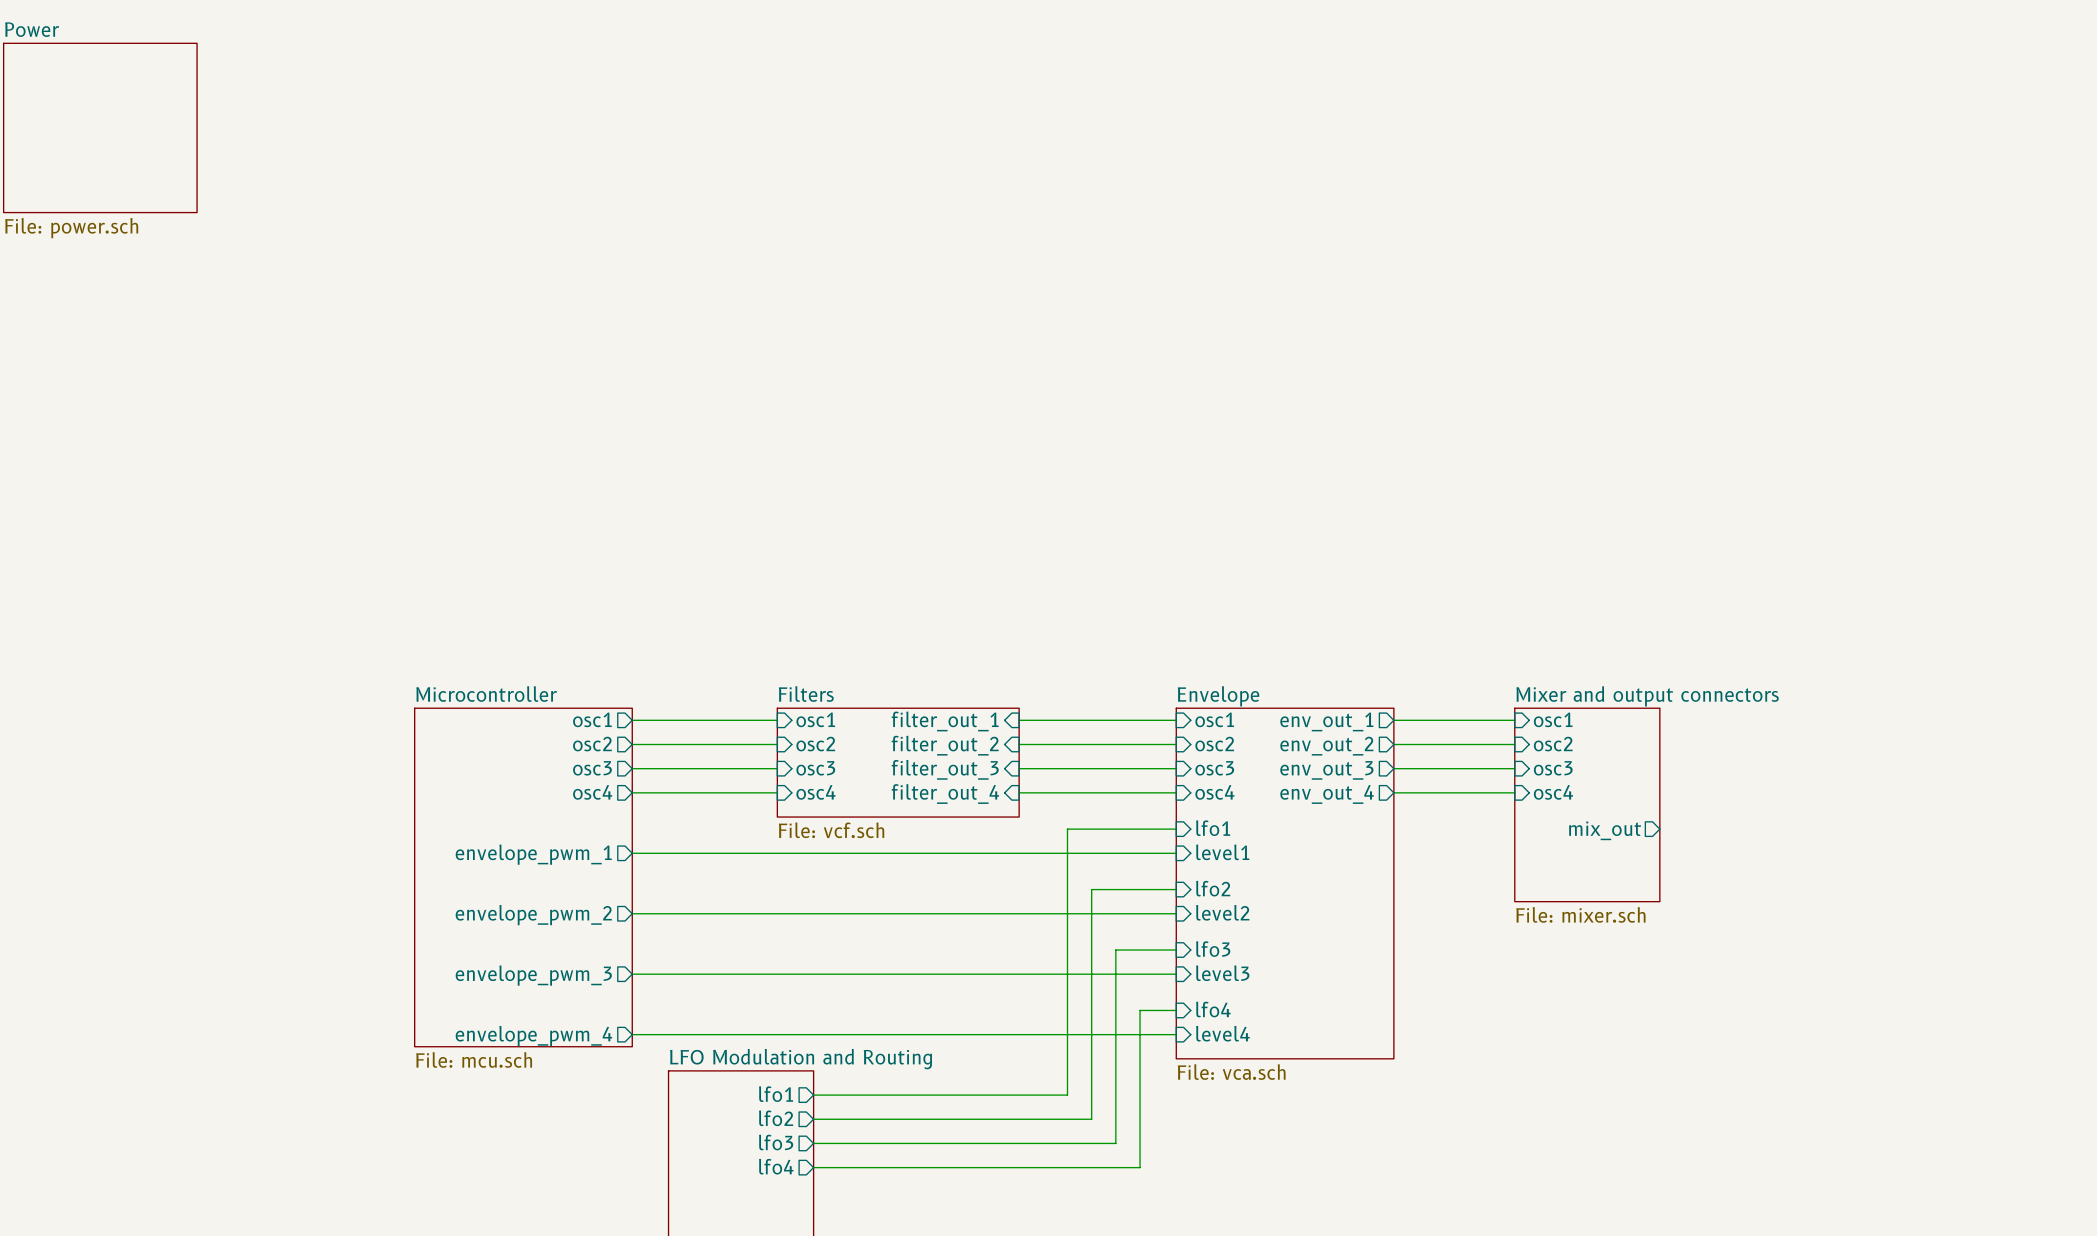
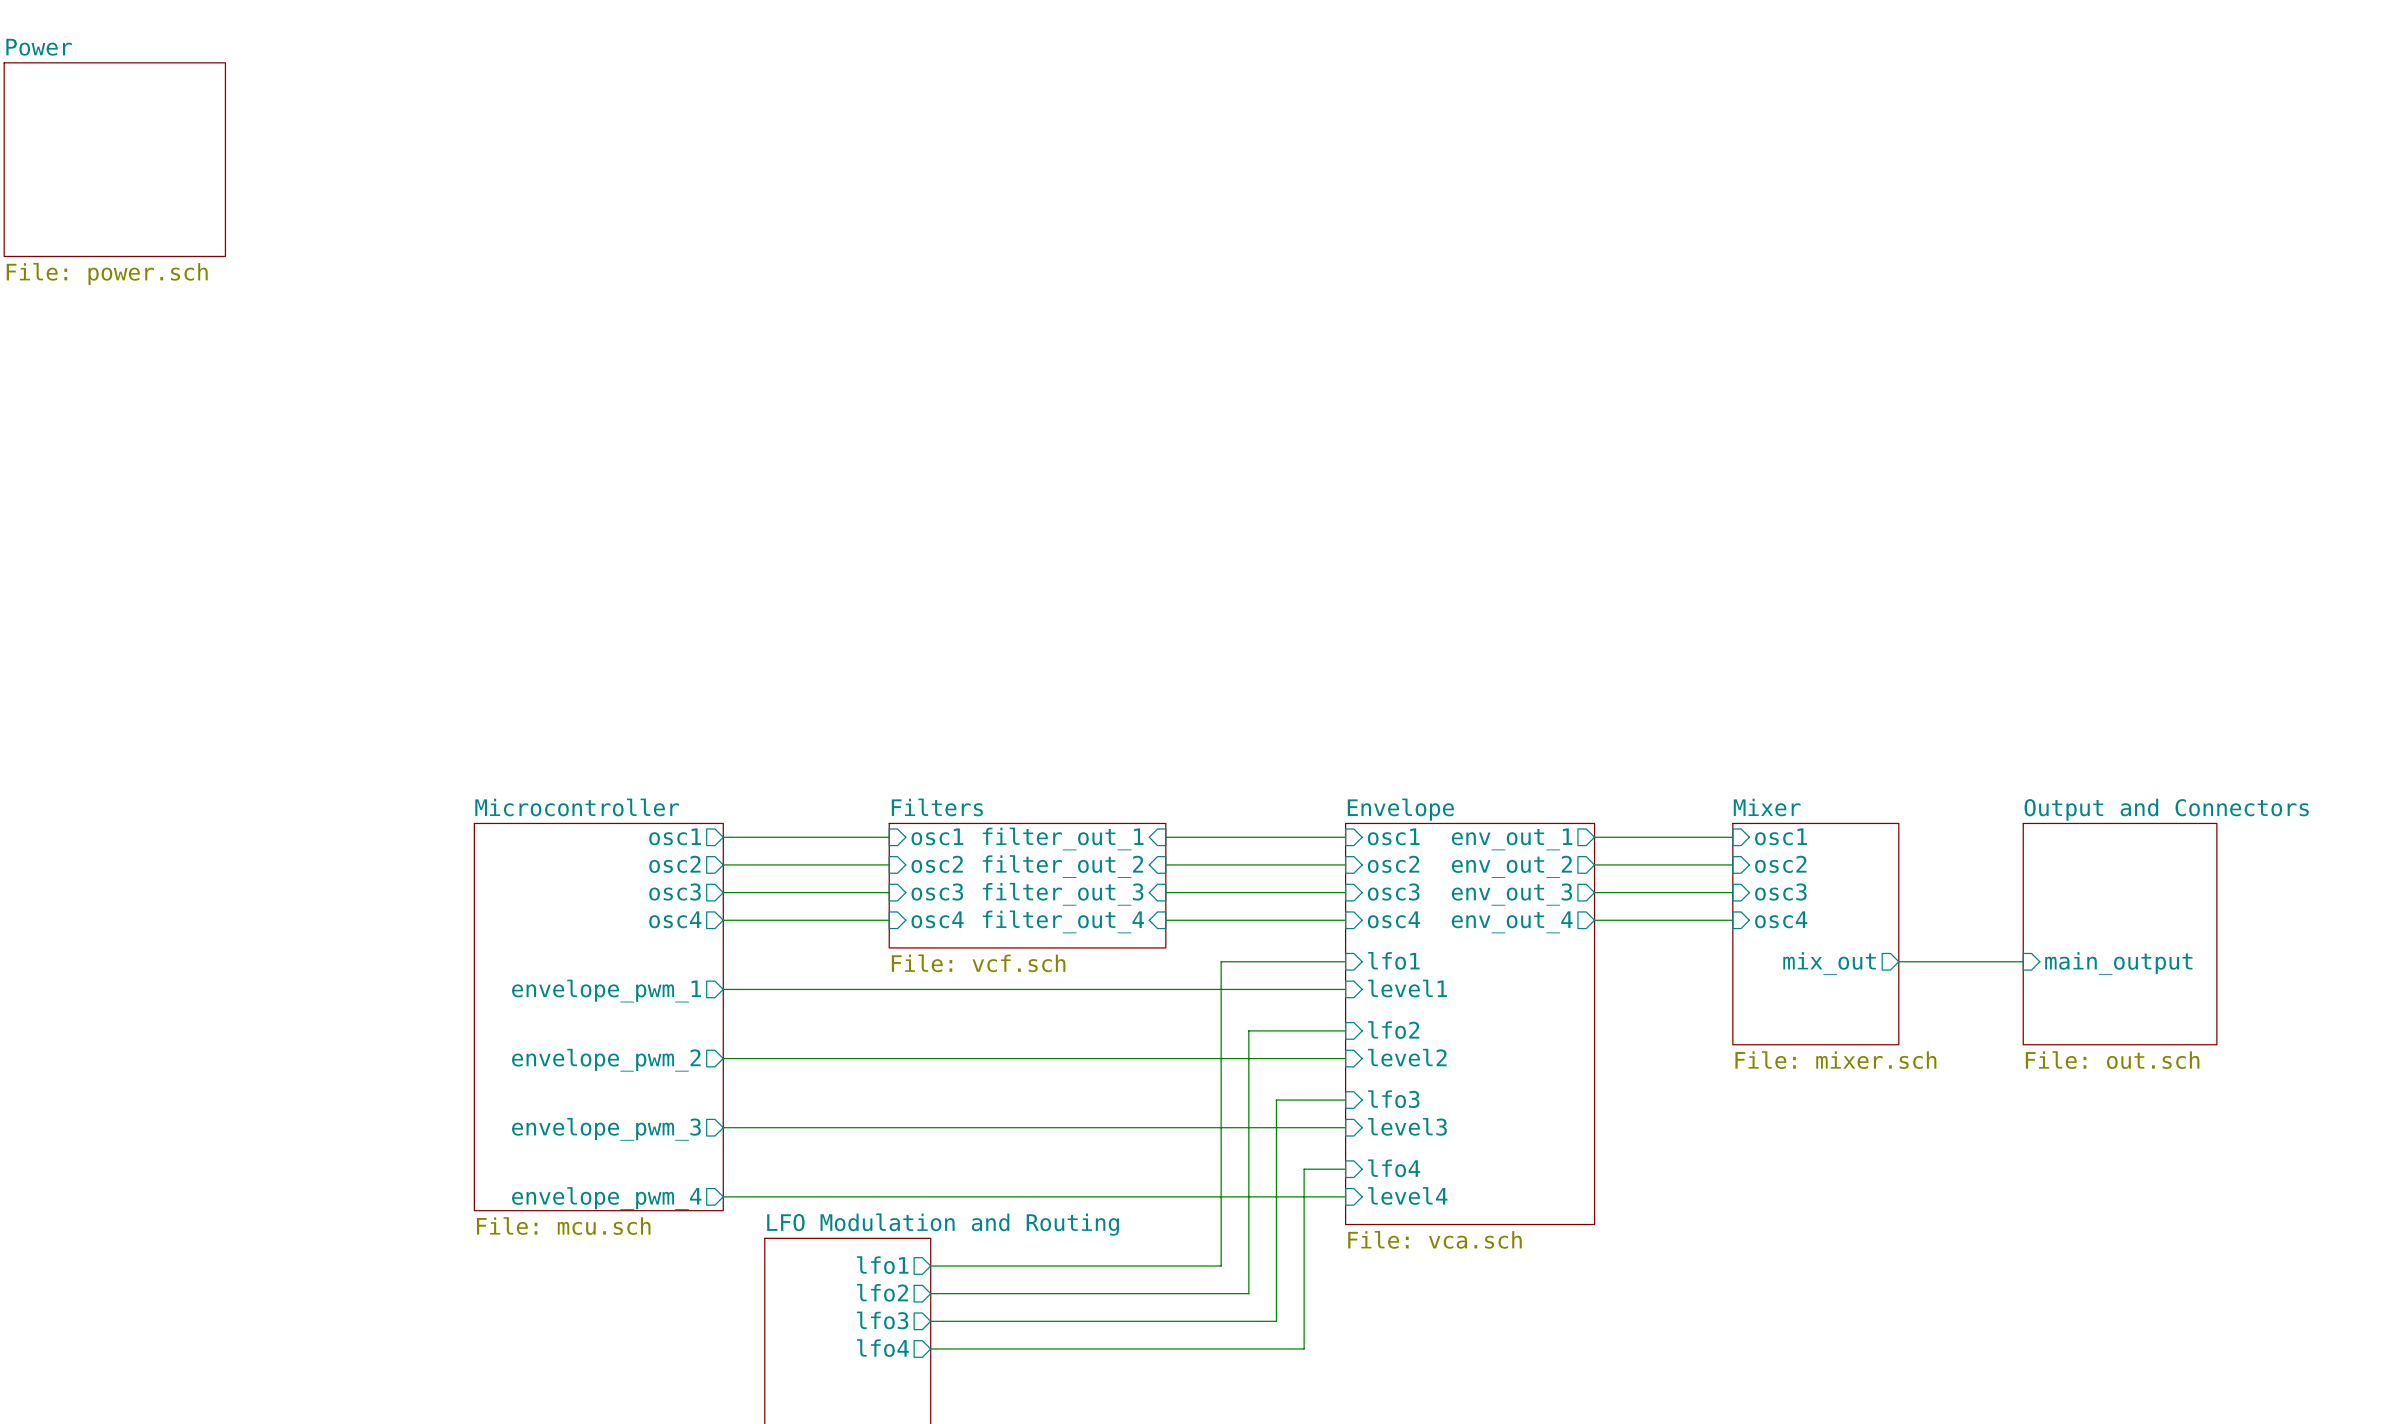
sheet Mixer and output connectors name: Mixer and output connectors (1647, 696) -> Mixer (1767, 807)
sheet Output and Connectors: none -> File: out.sch (2120, 934)
wire: none -> (1898, 961) (2023, 961)
sheet pin: none -> main_output (2118, 963)

